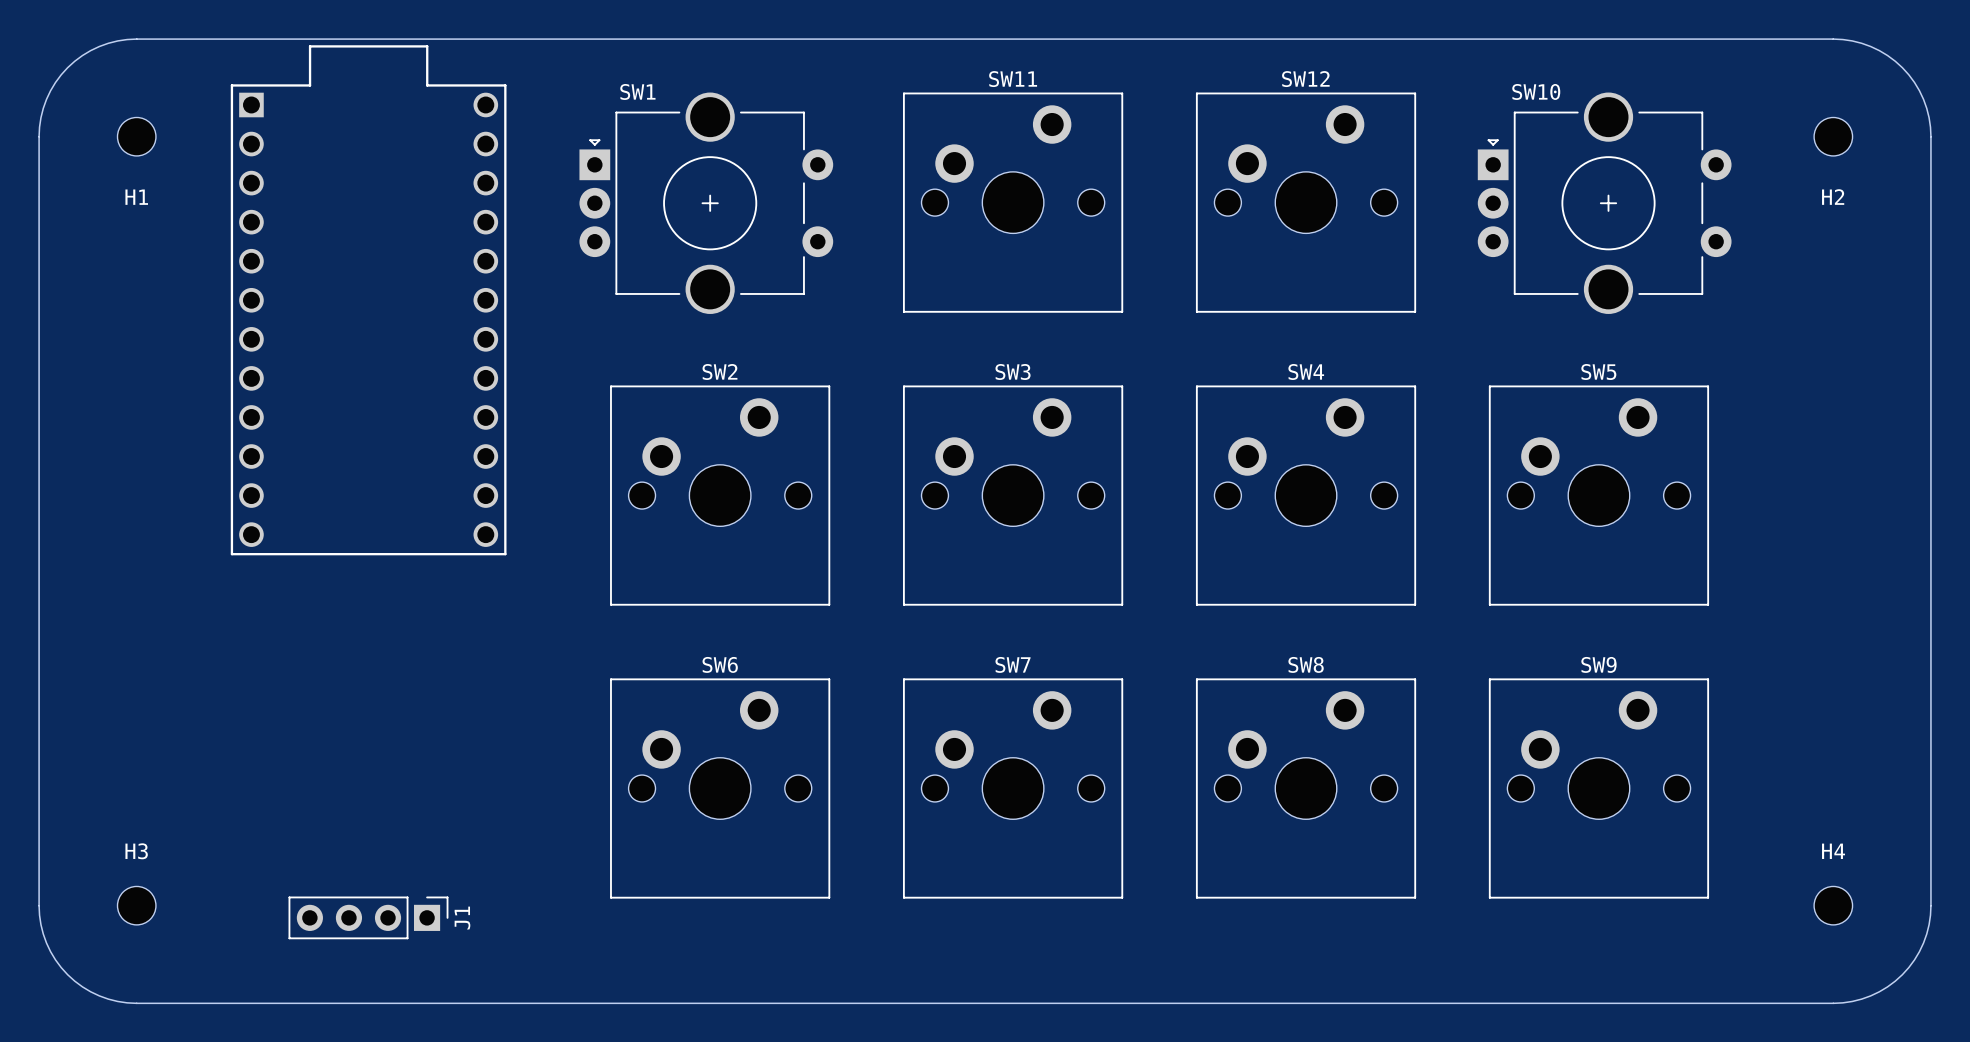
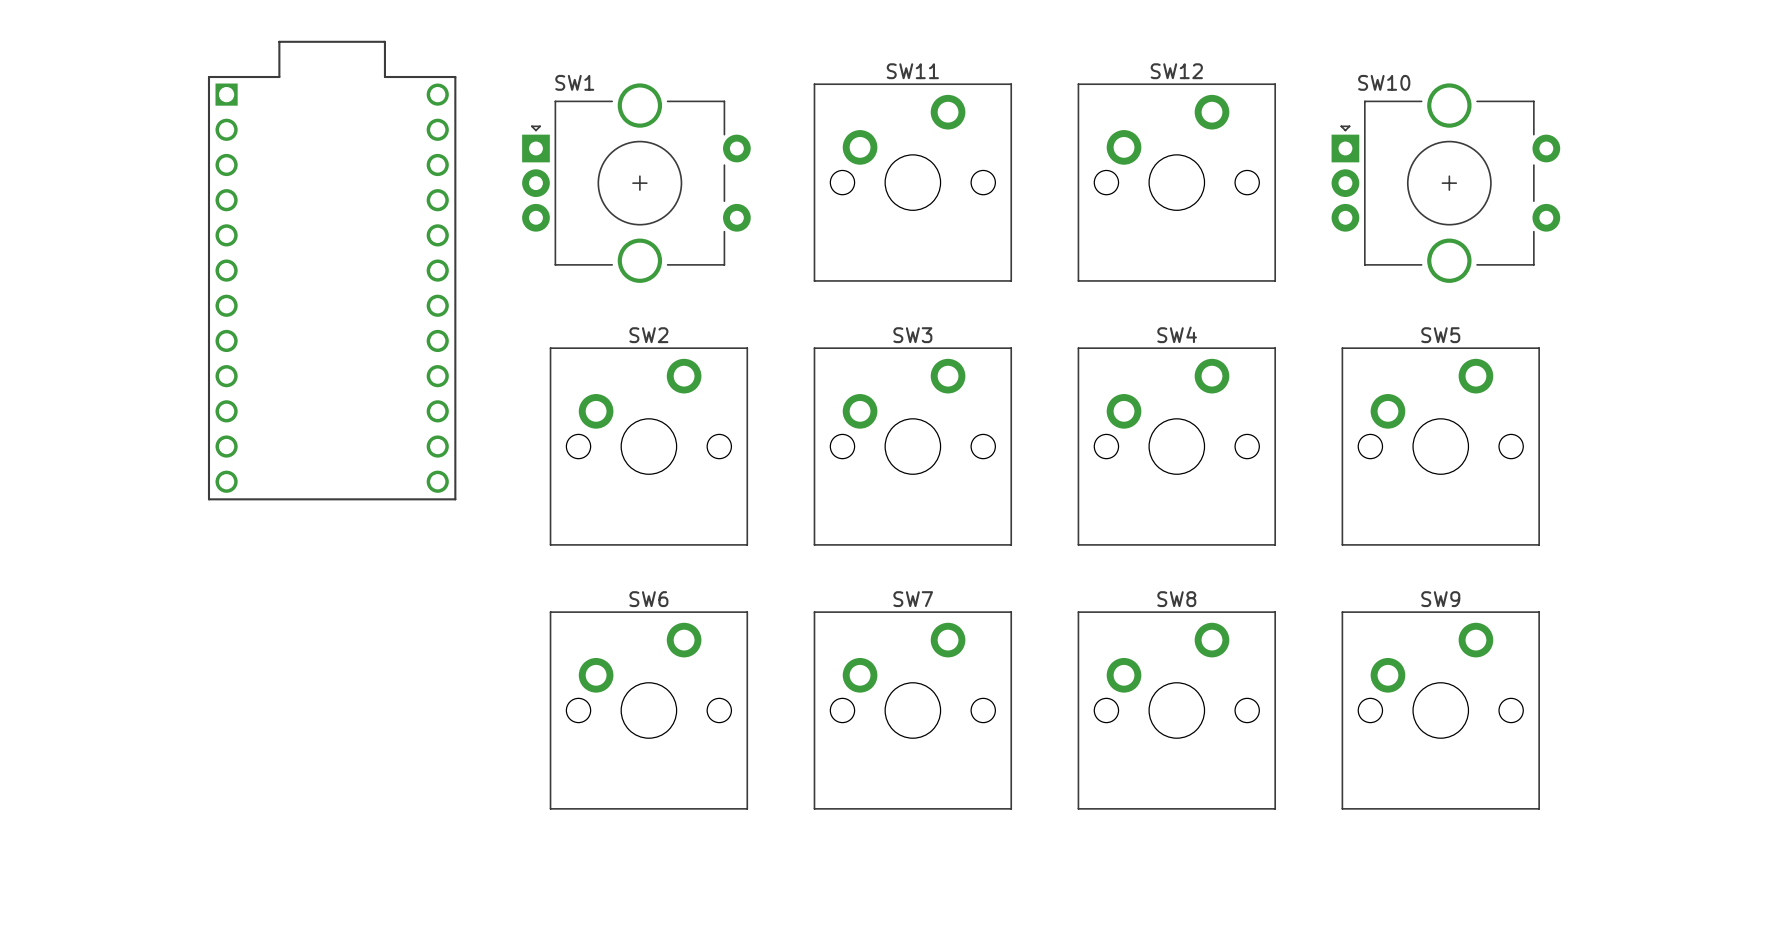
board edge: (136, 39) (1833, 39) (1861, 43) (1879, 50) (1902, 67) (1919, 90) (1926, 108) (1930, 136) (1930, 905) (1926, 934) (1919, 951) (1902, 974) (1879, 991) (1861, 999) (1833, 1003) (136, 1003) (108, 999) (90, 991) (67, 974) (55, 959) (46, 943) (39, 915) (39, 136) (40, 117) (46, 99) (55, 82) (67, 67) (82, 55) (99, 46) (117, 40) (136, 39) -> none
H1: (136, 136) -> none
H2: (1833, 136) -> none
H3: (136, 905) -> none
H4: (1833, 905) -> none
J1: (368, 917) -> none

